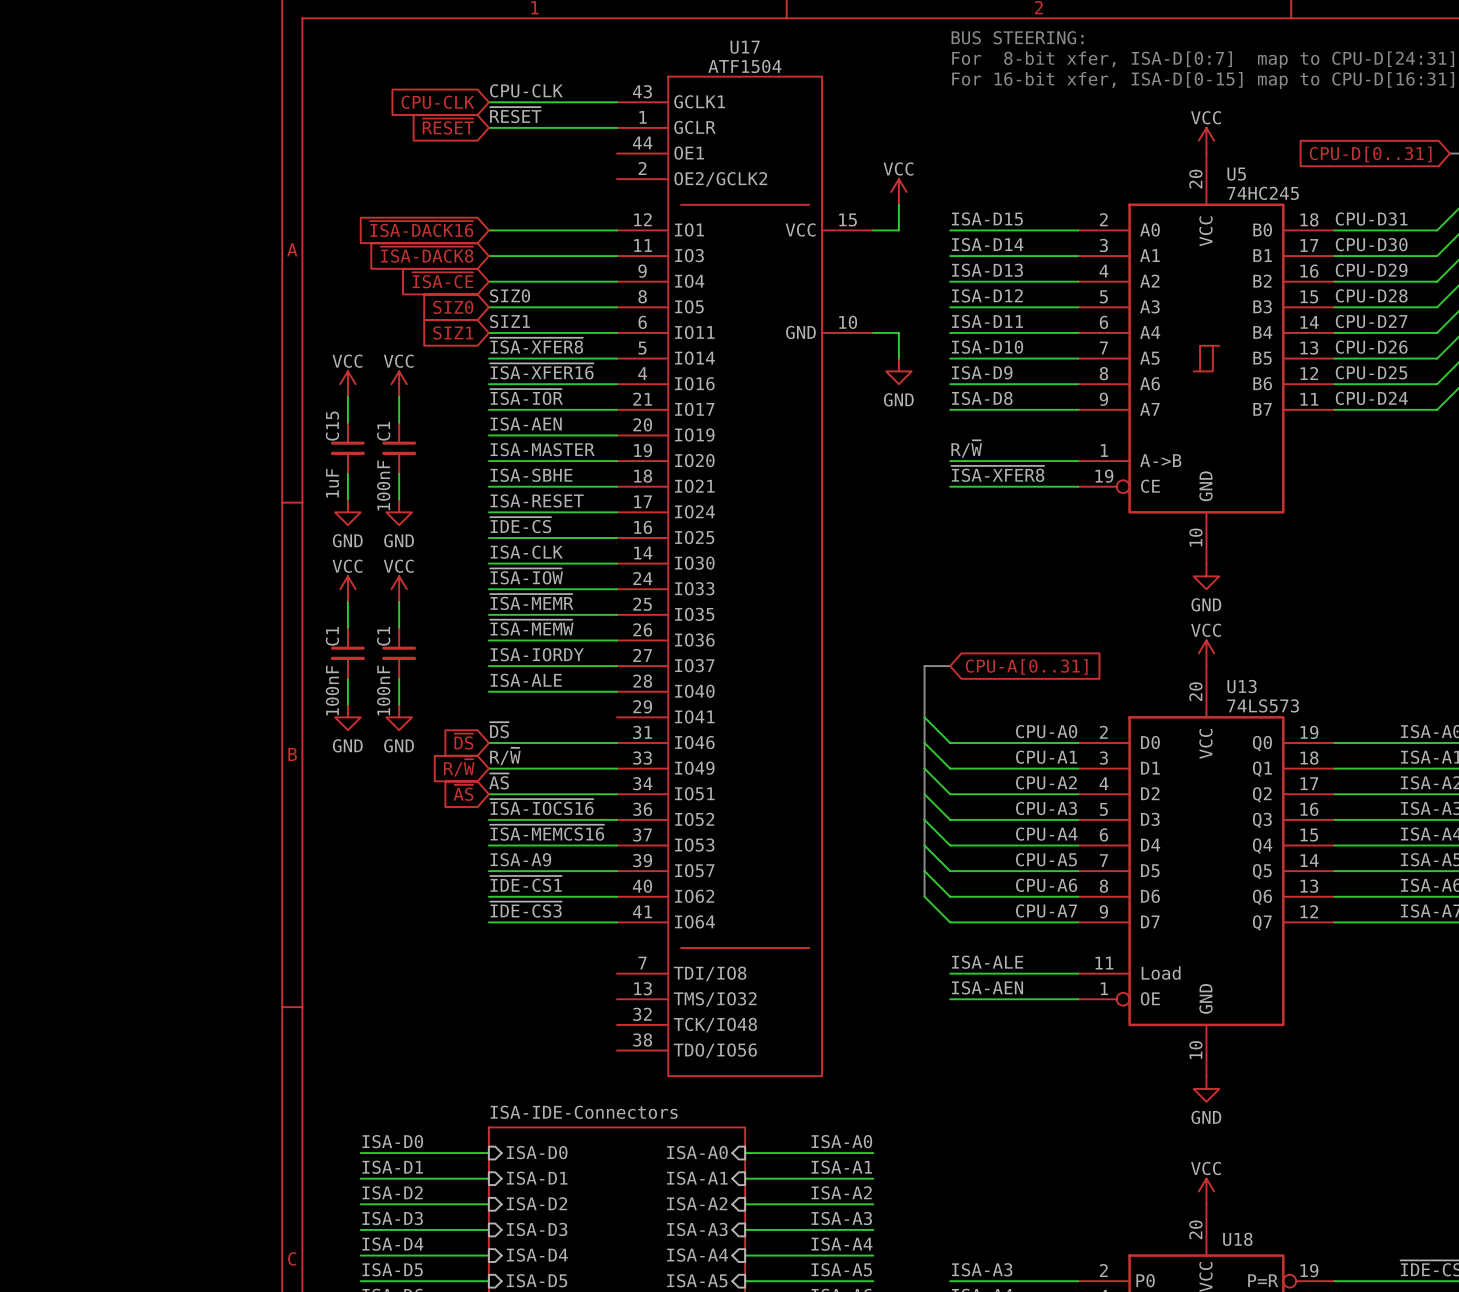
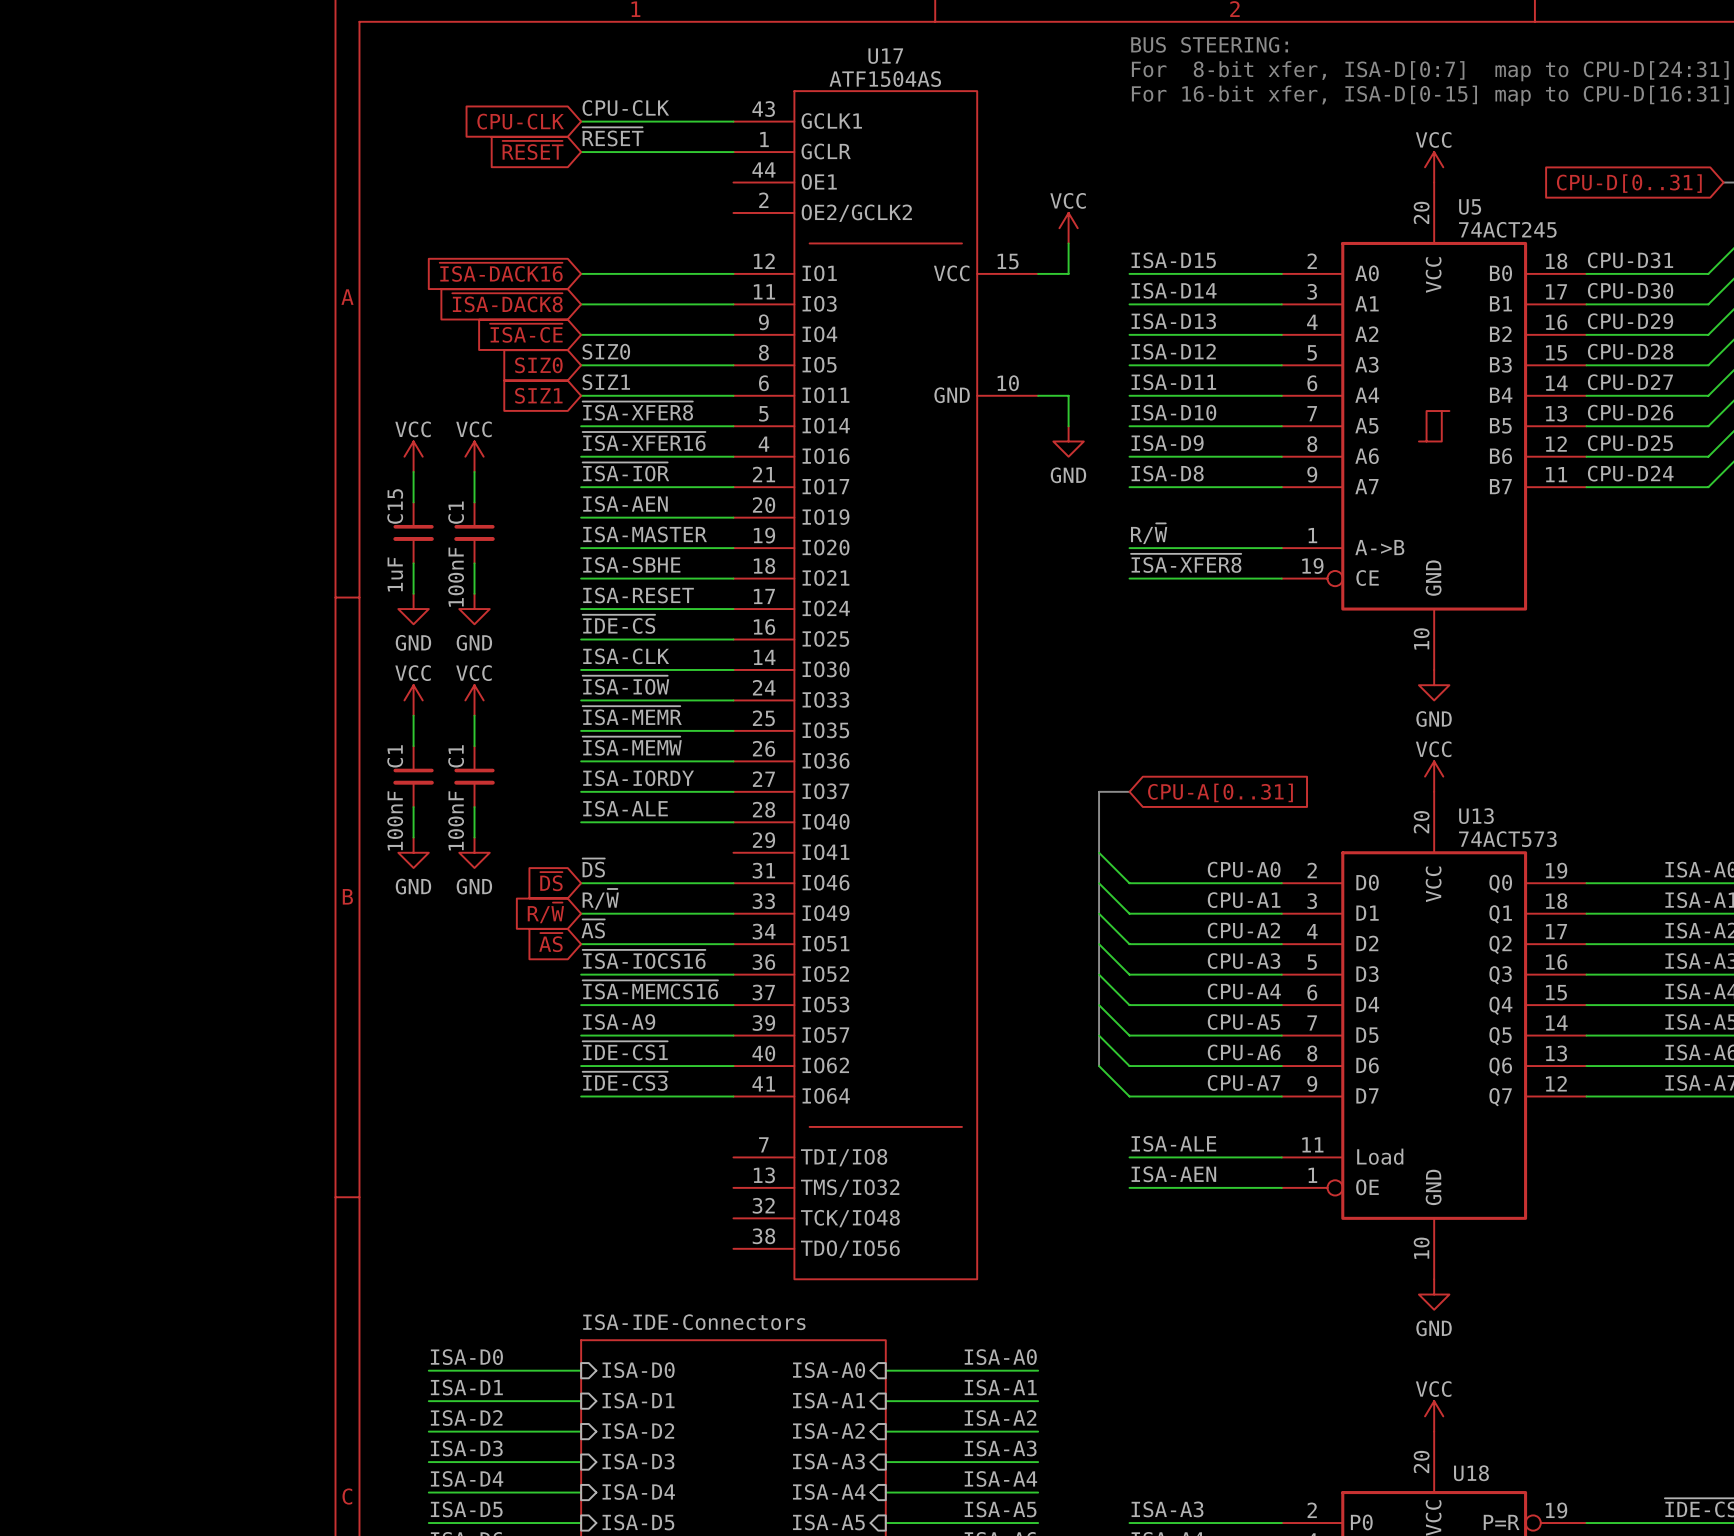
U17 value: ATF1504 (744, 66) -> ATF1504AS (885, 79)
U5 value: 74HC245 (1263, 193) -> 74ACT245 (1507, 229)
U13 value: 74LS573 (1263, 705) -> 74ACT573 (1507, 839)

